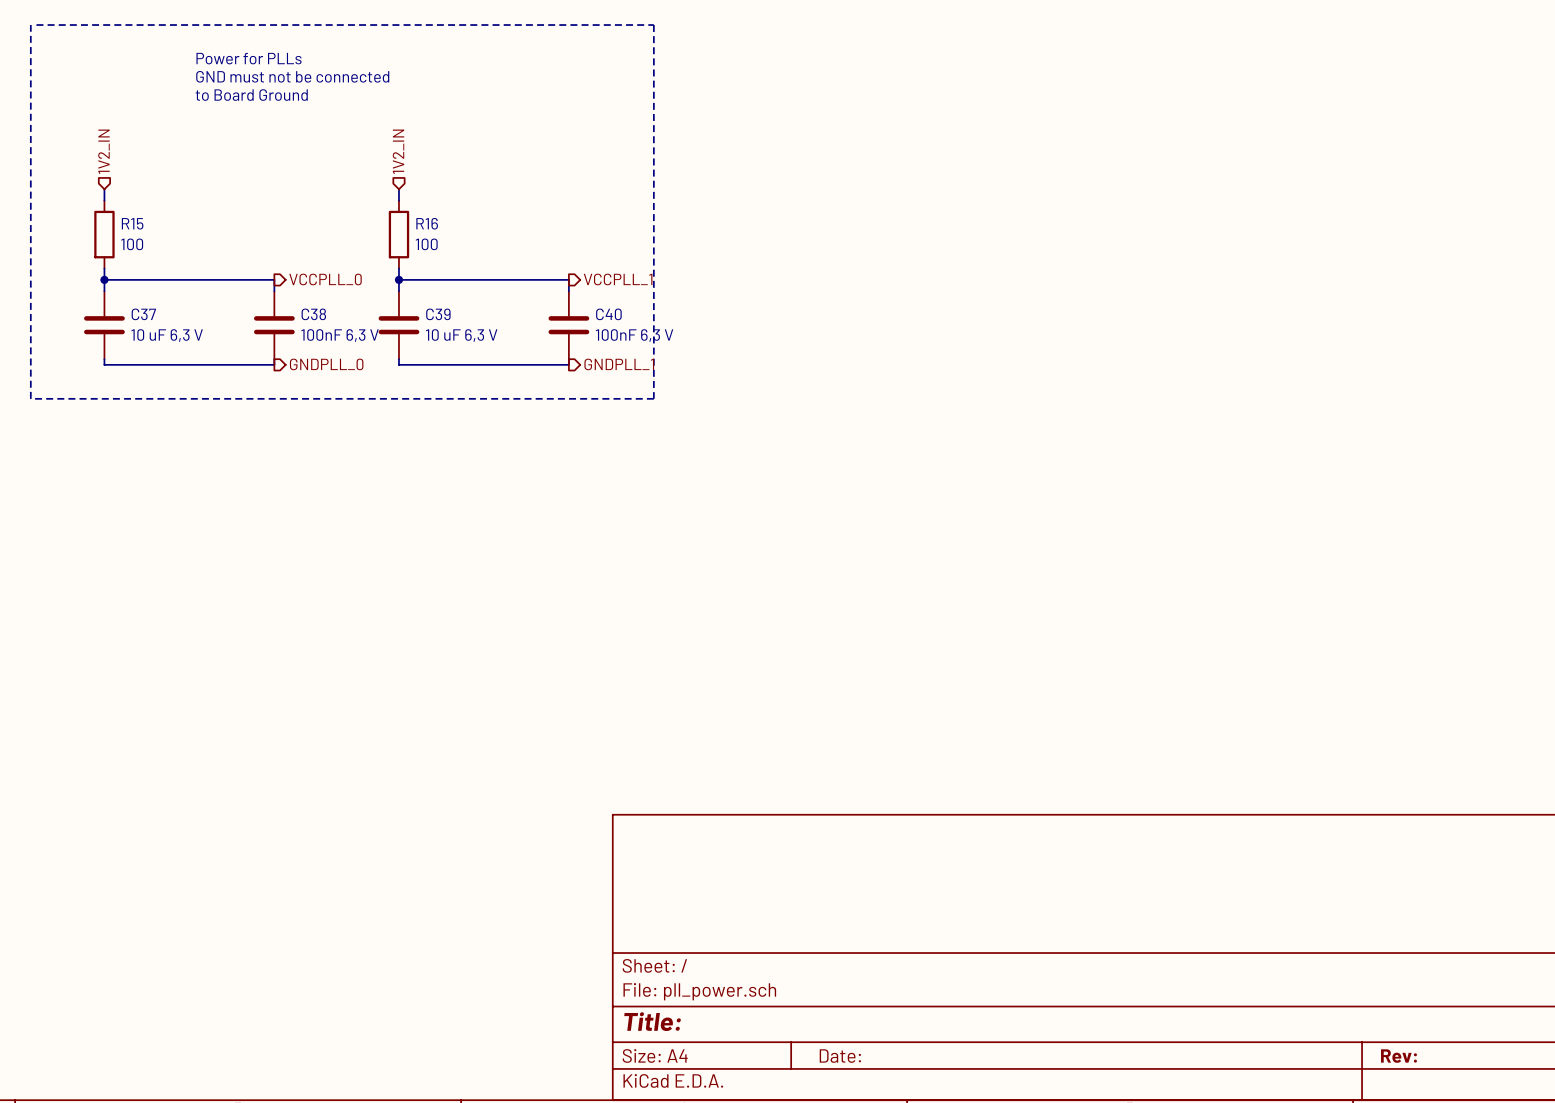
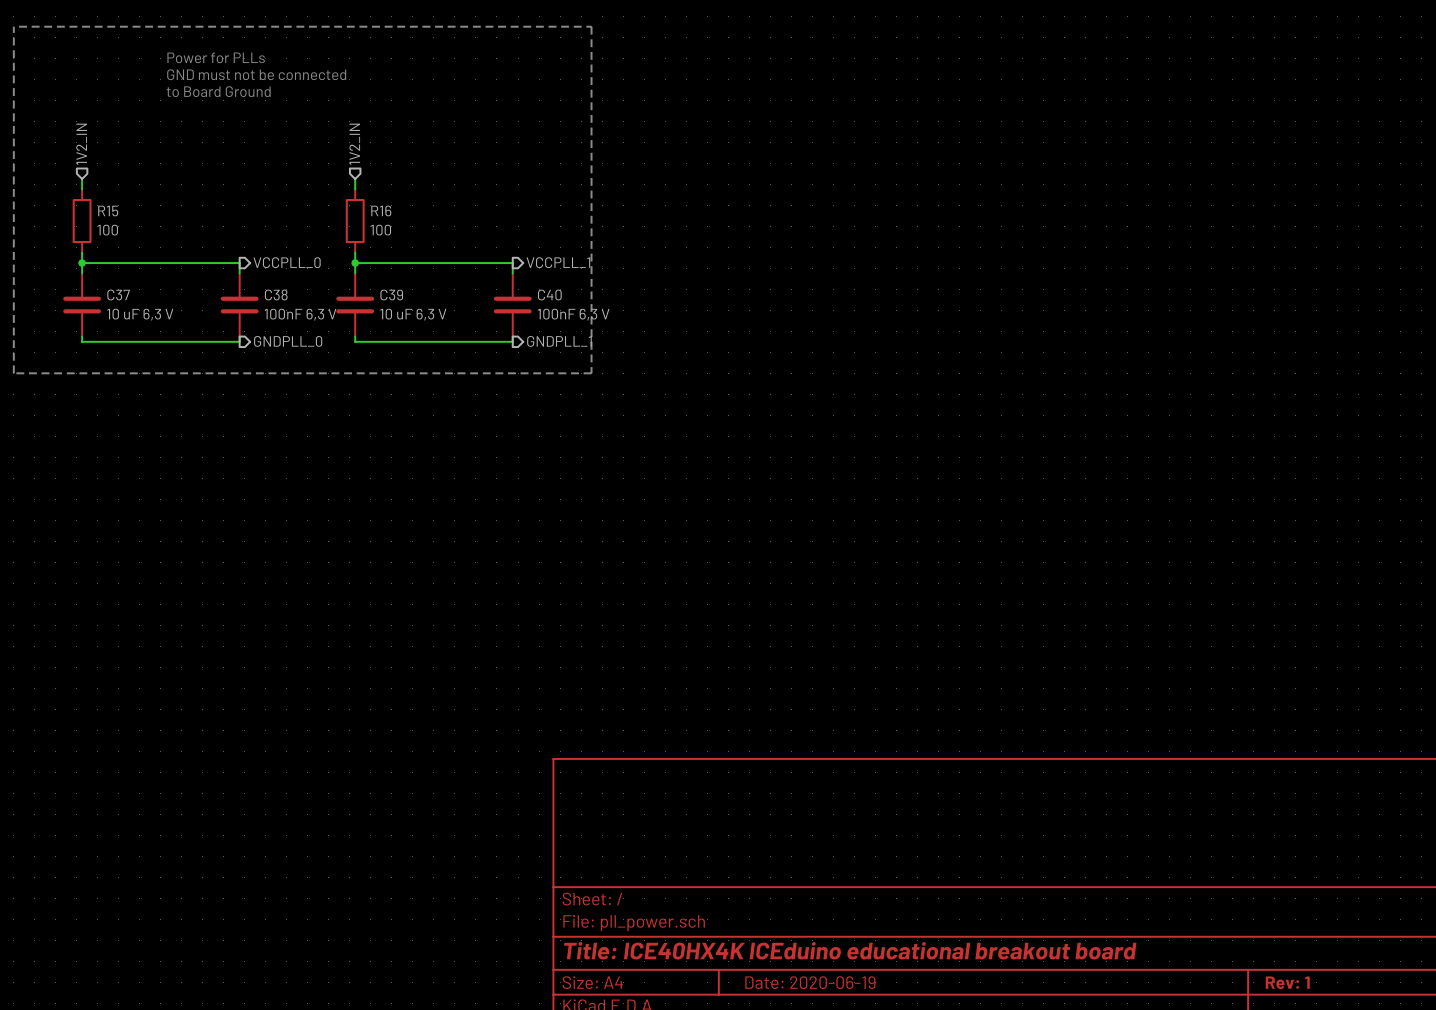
title block: Title: (652, 1021) -> Title: ICE40HX4K ICEduino educational breakout board (850, 950)
title block: Date: (840, 1056) -> Date: 2020-06-19 (810, 982)
title block: Rev: (1398, 1056) -> Rev: 1 (1287, 982)

